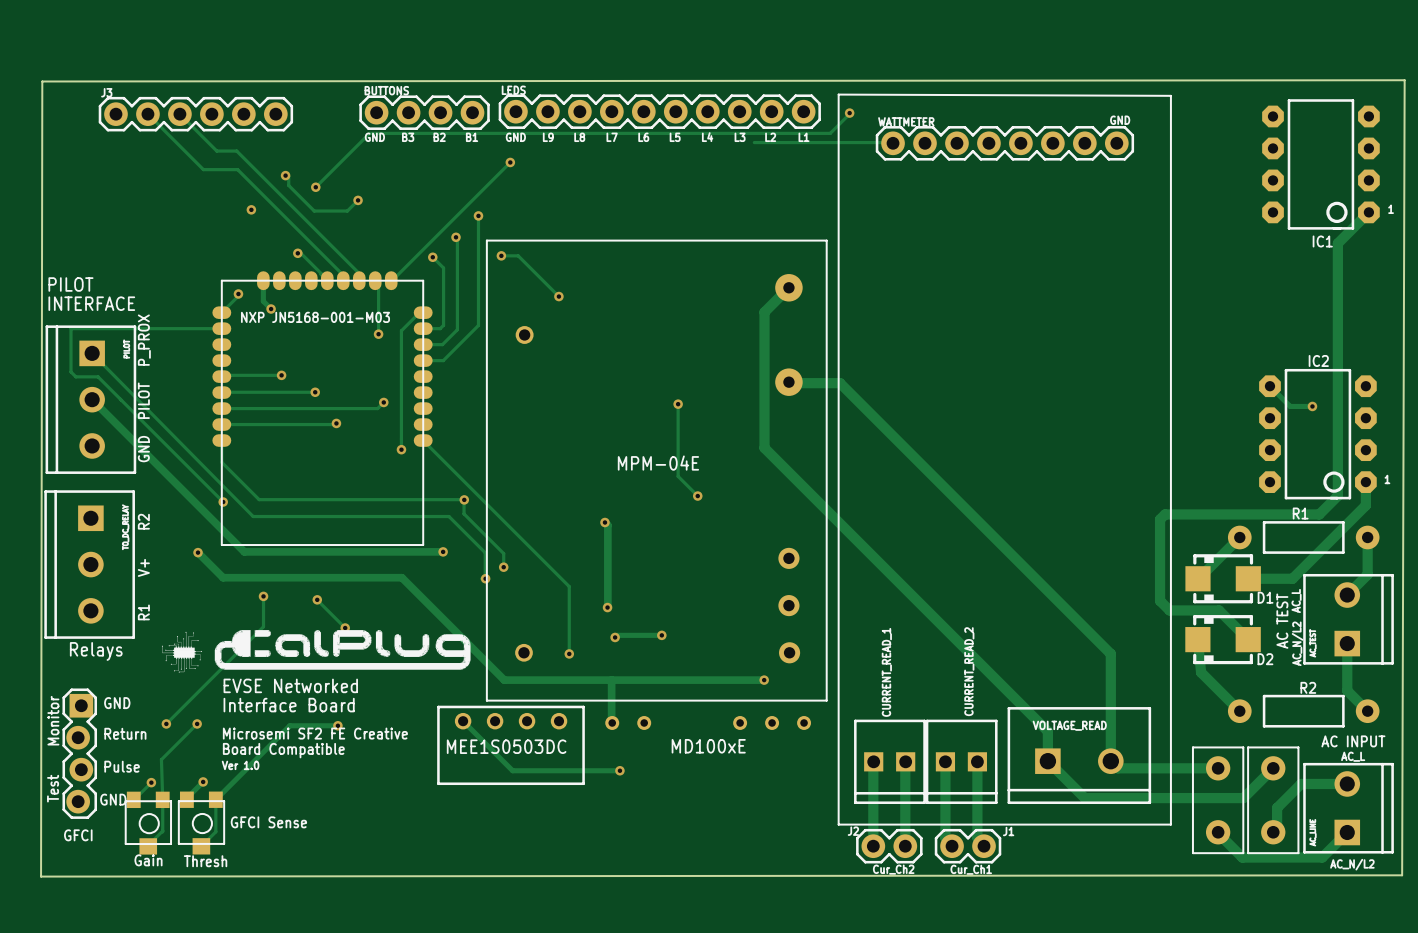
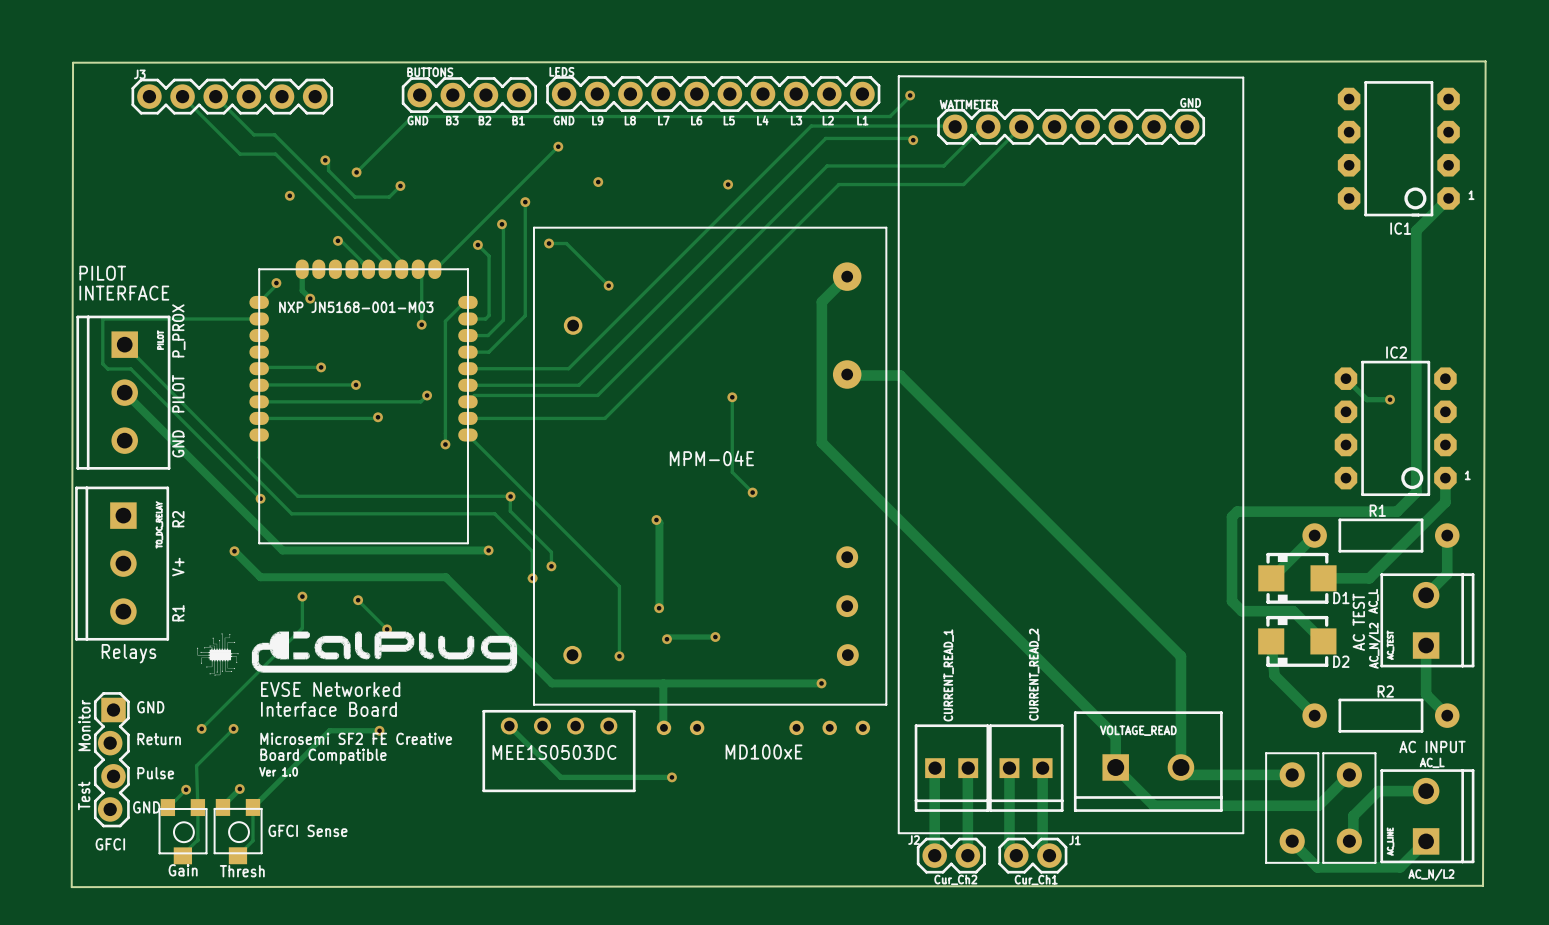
track: none -> (811, 126) (568, 368) (467, 368)
track: none -> (988, 126) (983, 126) (943, 165) (827, 165) (597, 395) (474, 395) (467, 401)
track: none -> (1021, 126) (963, 184) (838, 184) (604, 418) (467, 418)
track: none -> (913, 140) (911, 138) (825, 138) (578, 385) (467, 385)
via: none -> (913, 140)
via: none -> (598, 182)
via: none -> (728, 184)

